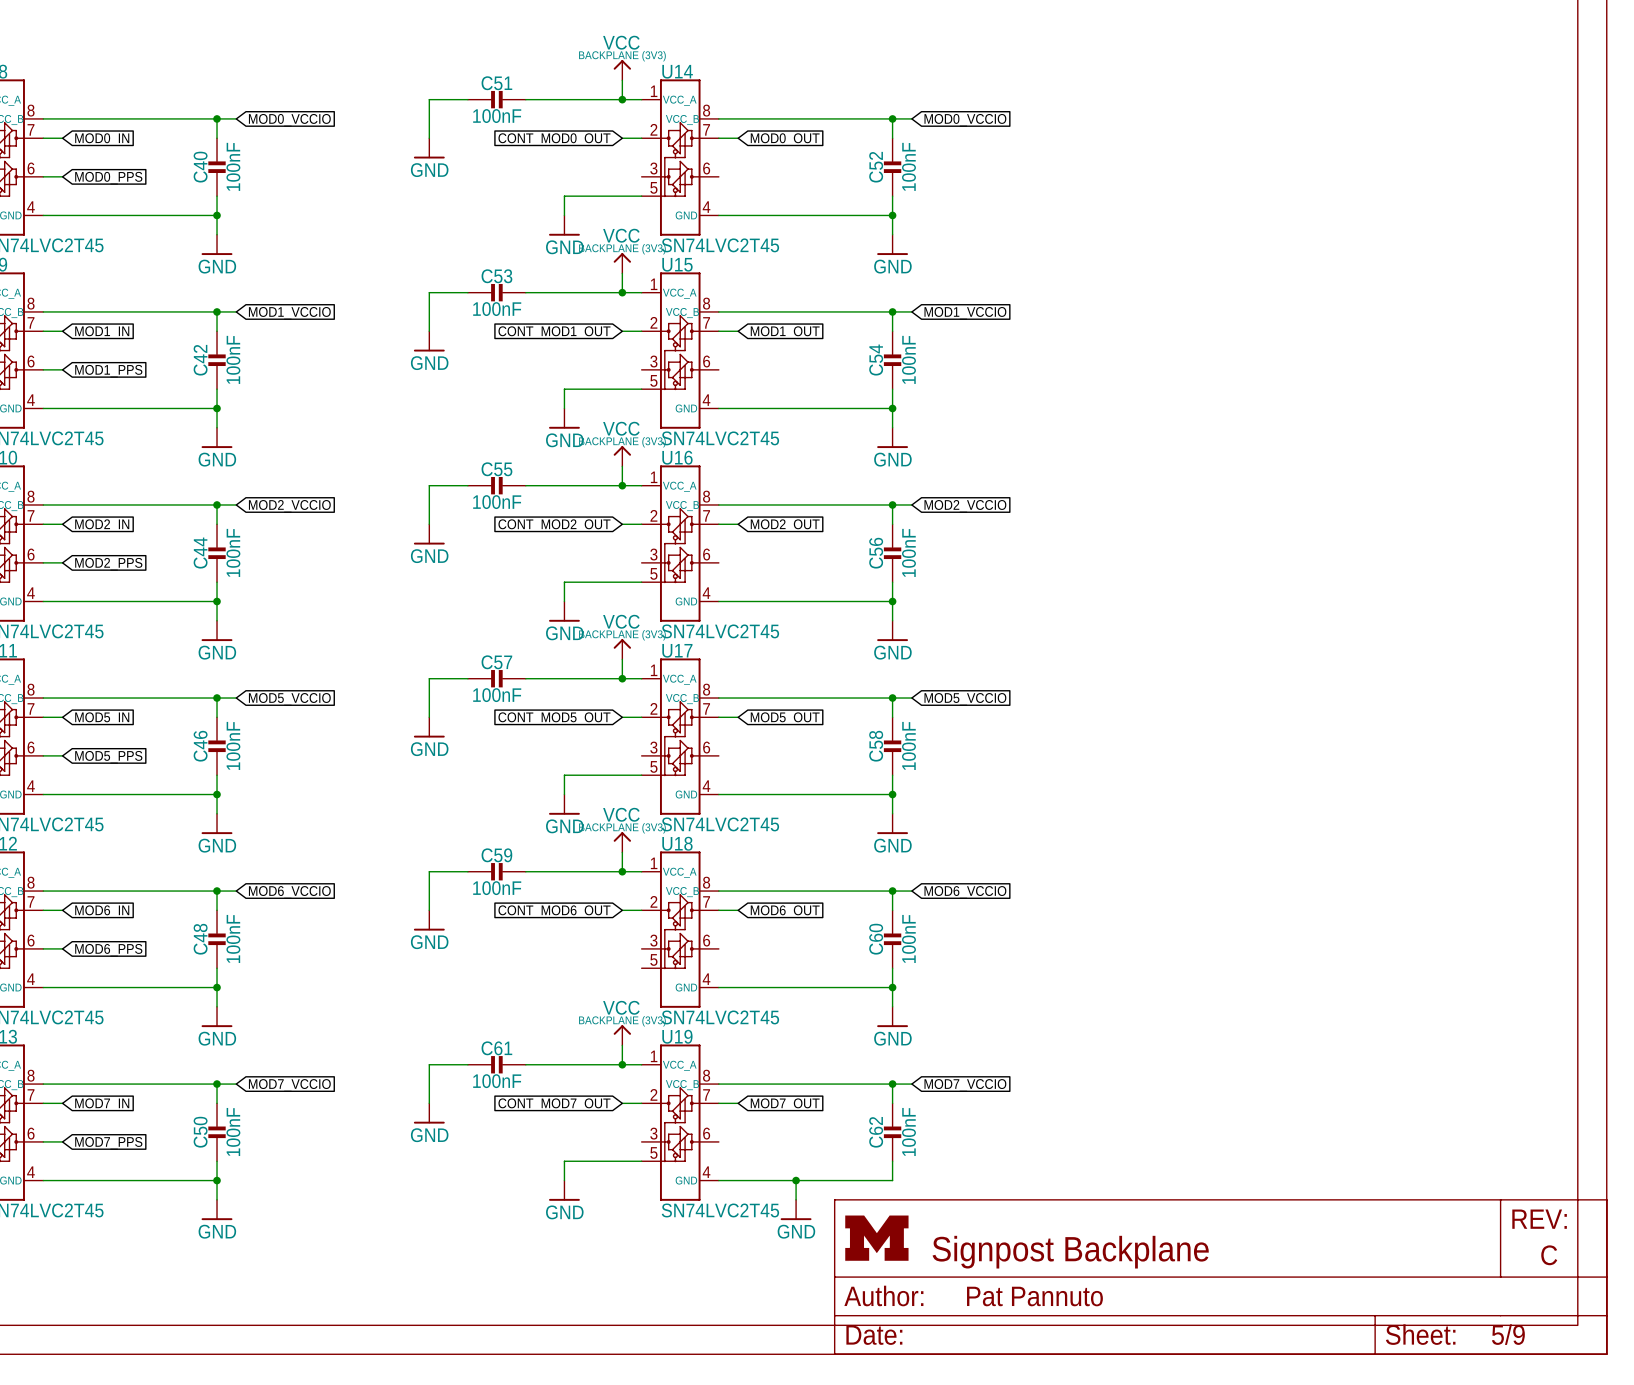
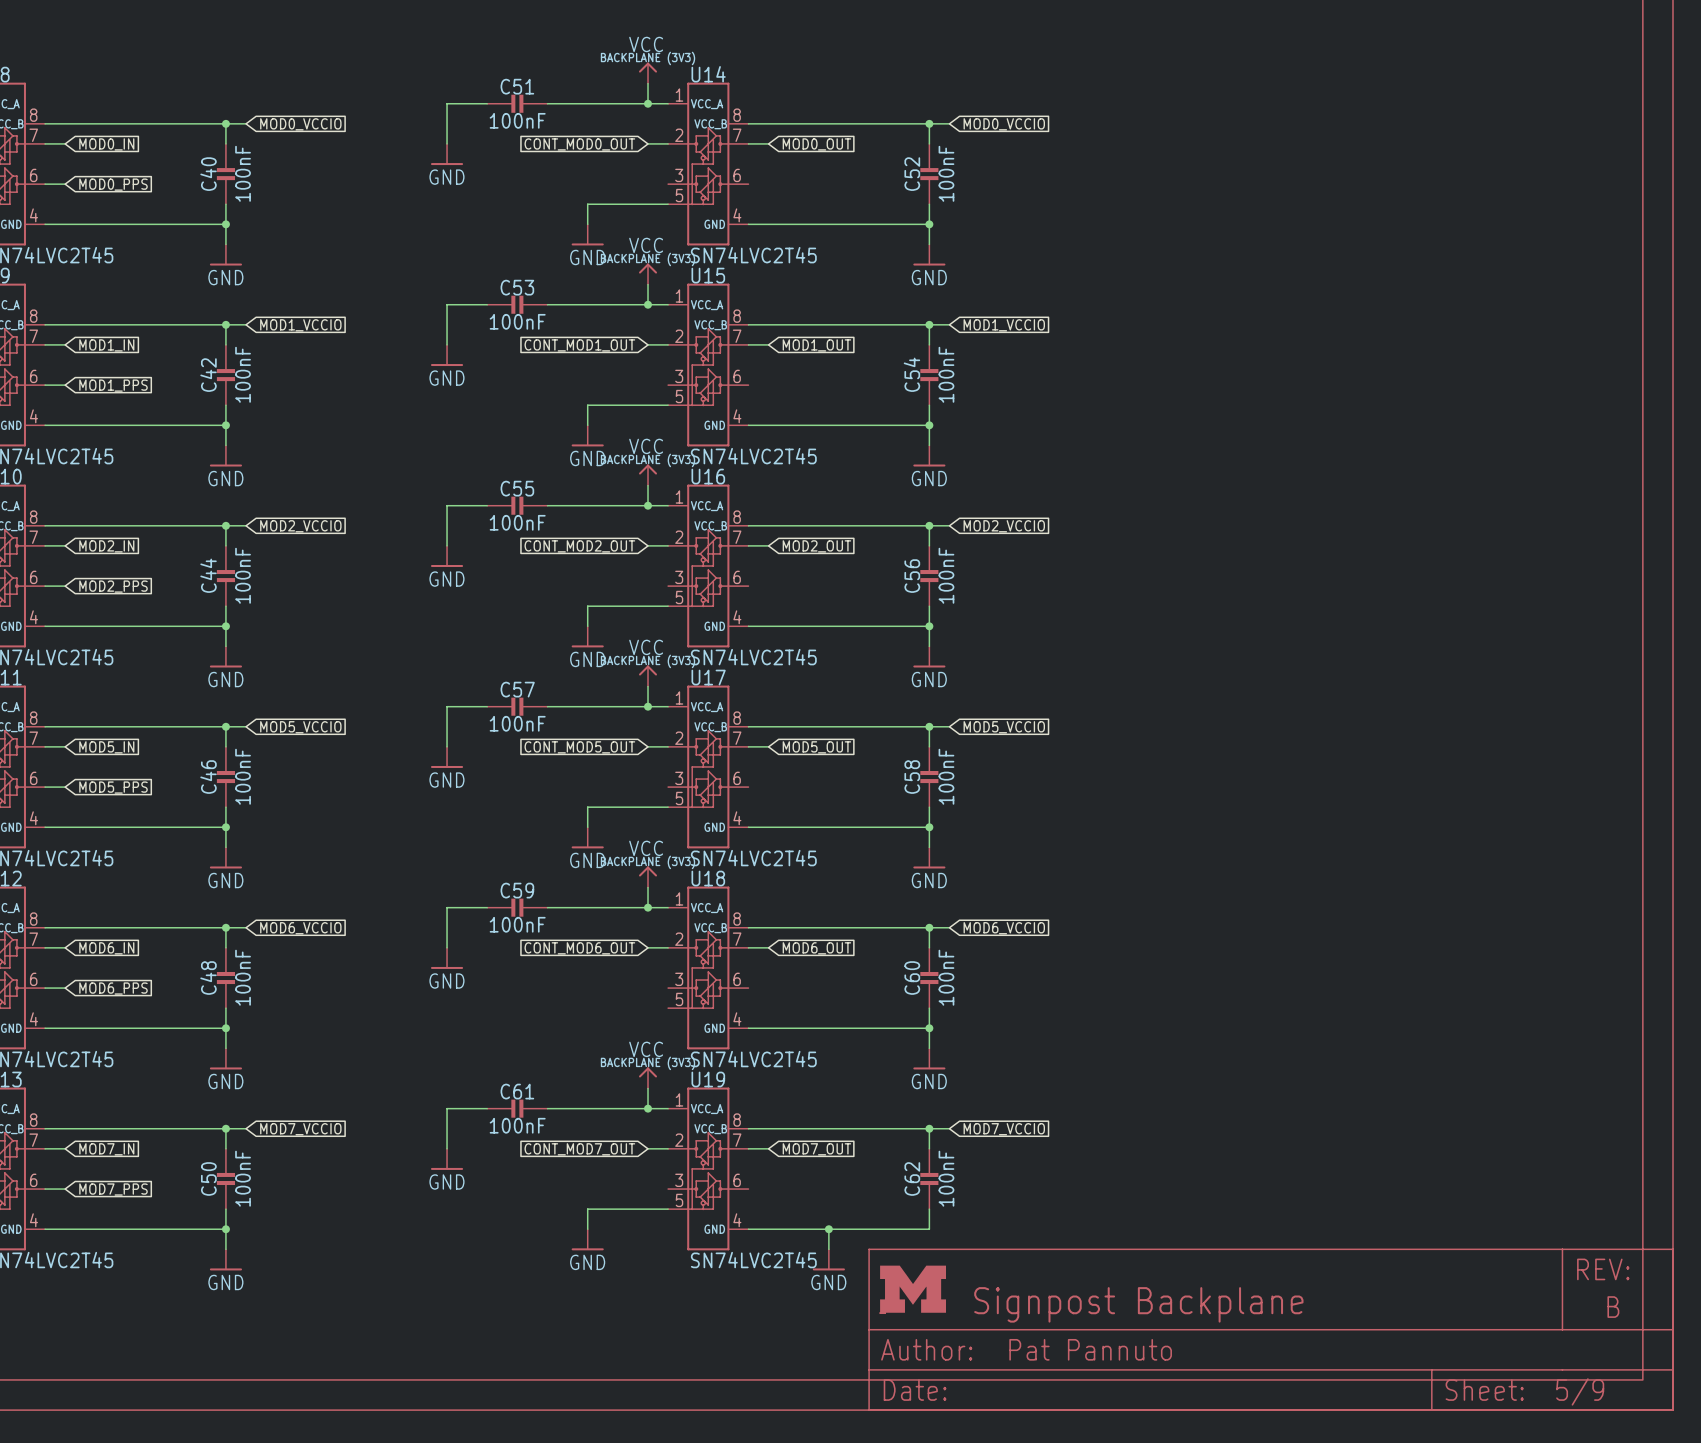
part text: C (1549, 1255) -> B (1613, 1307)

